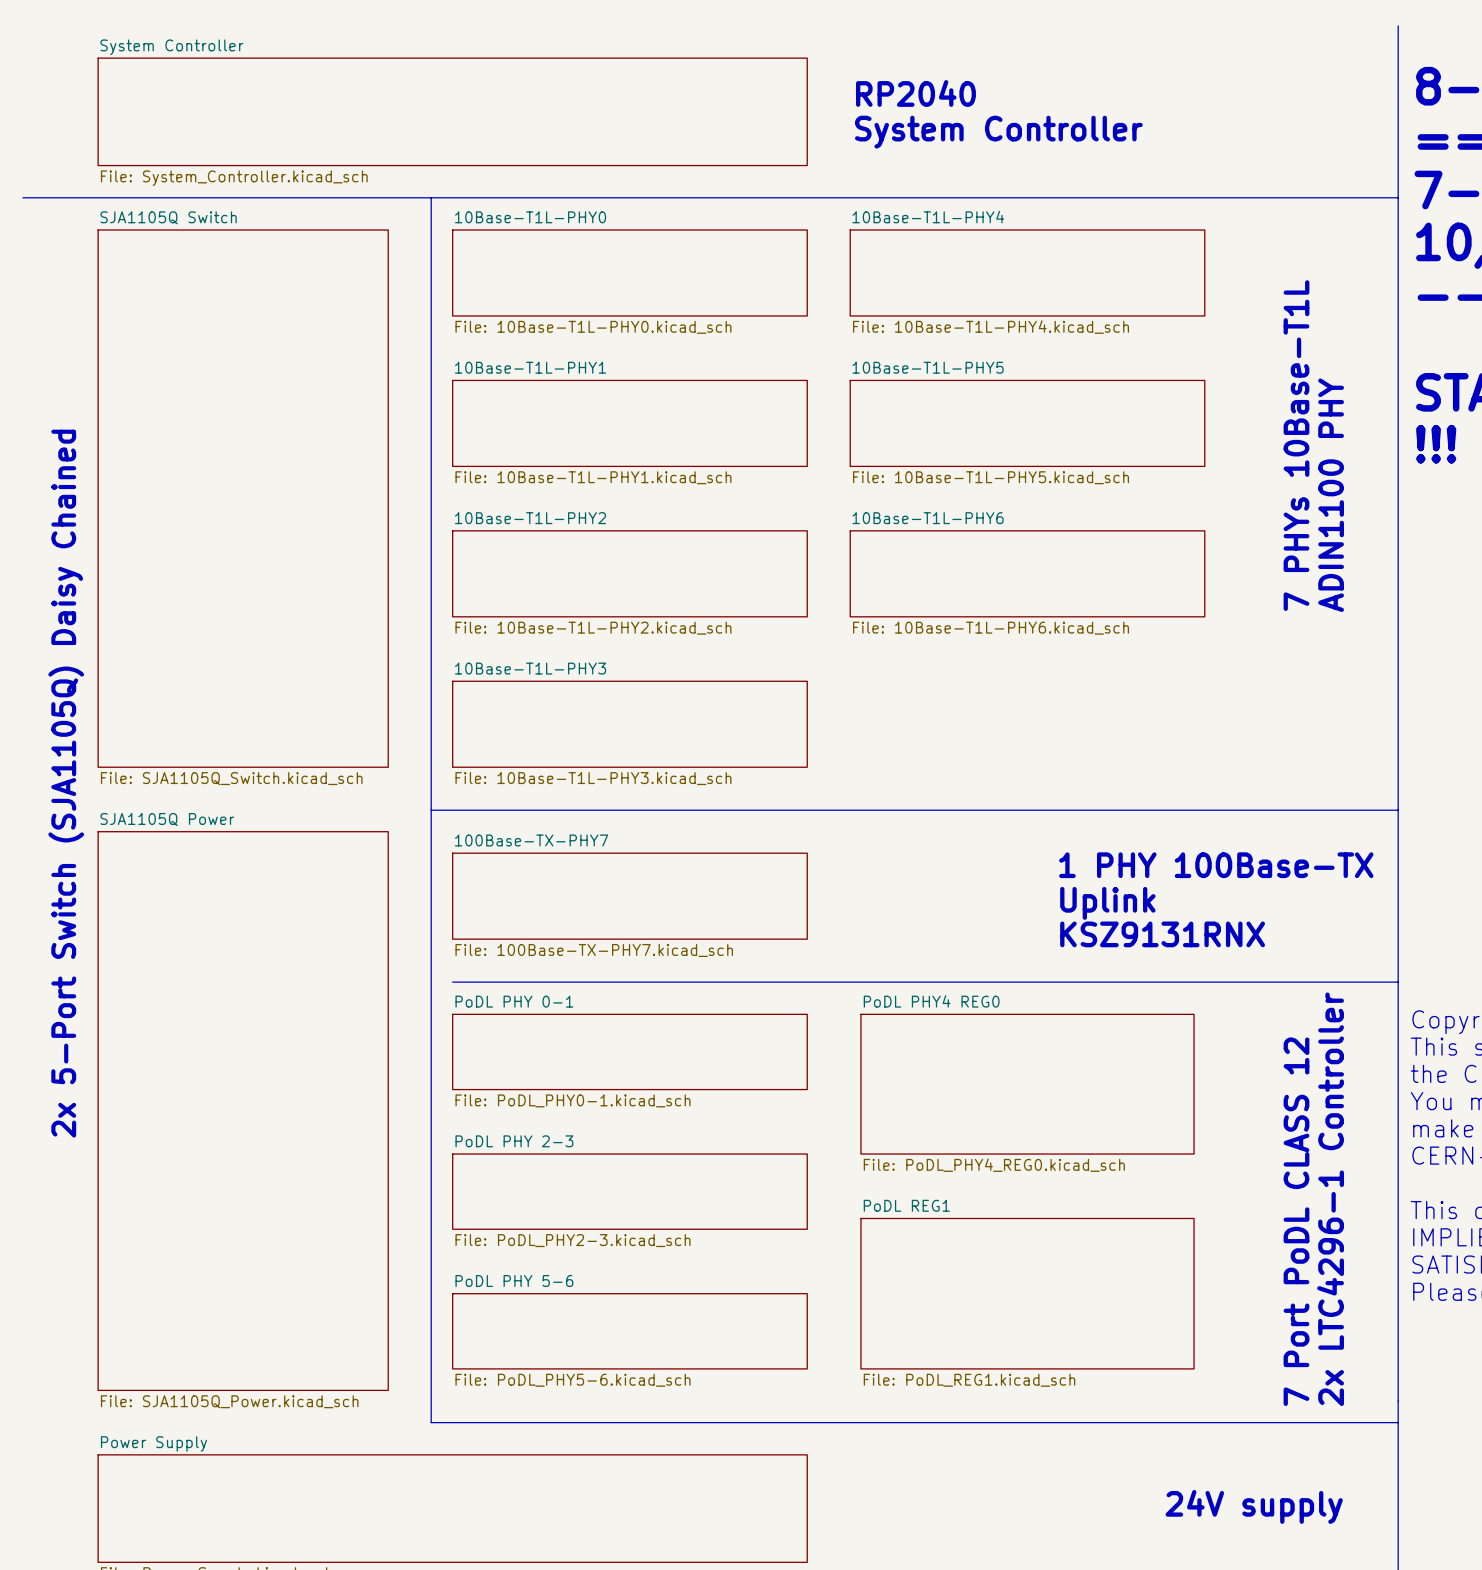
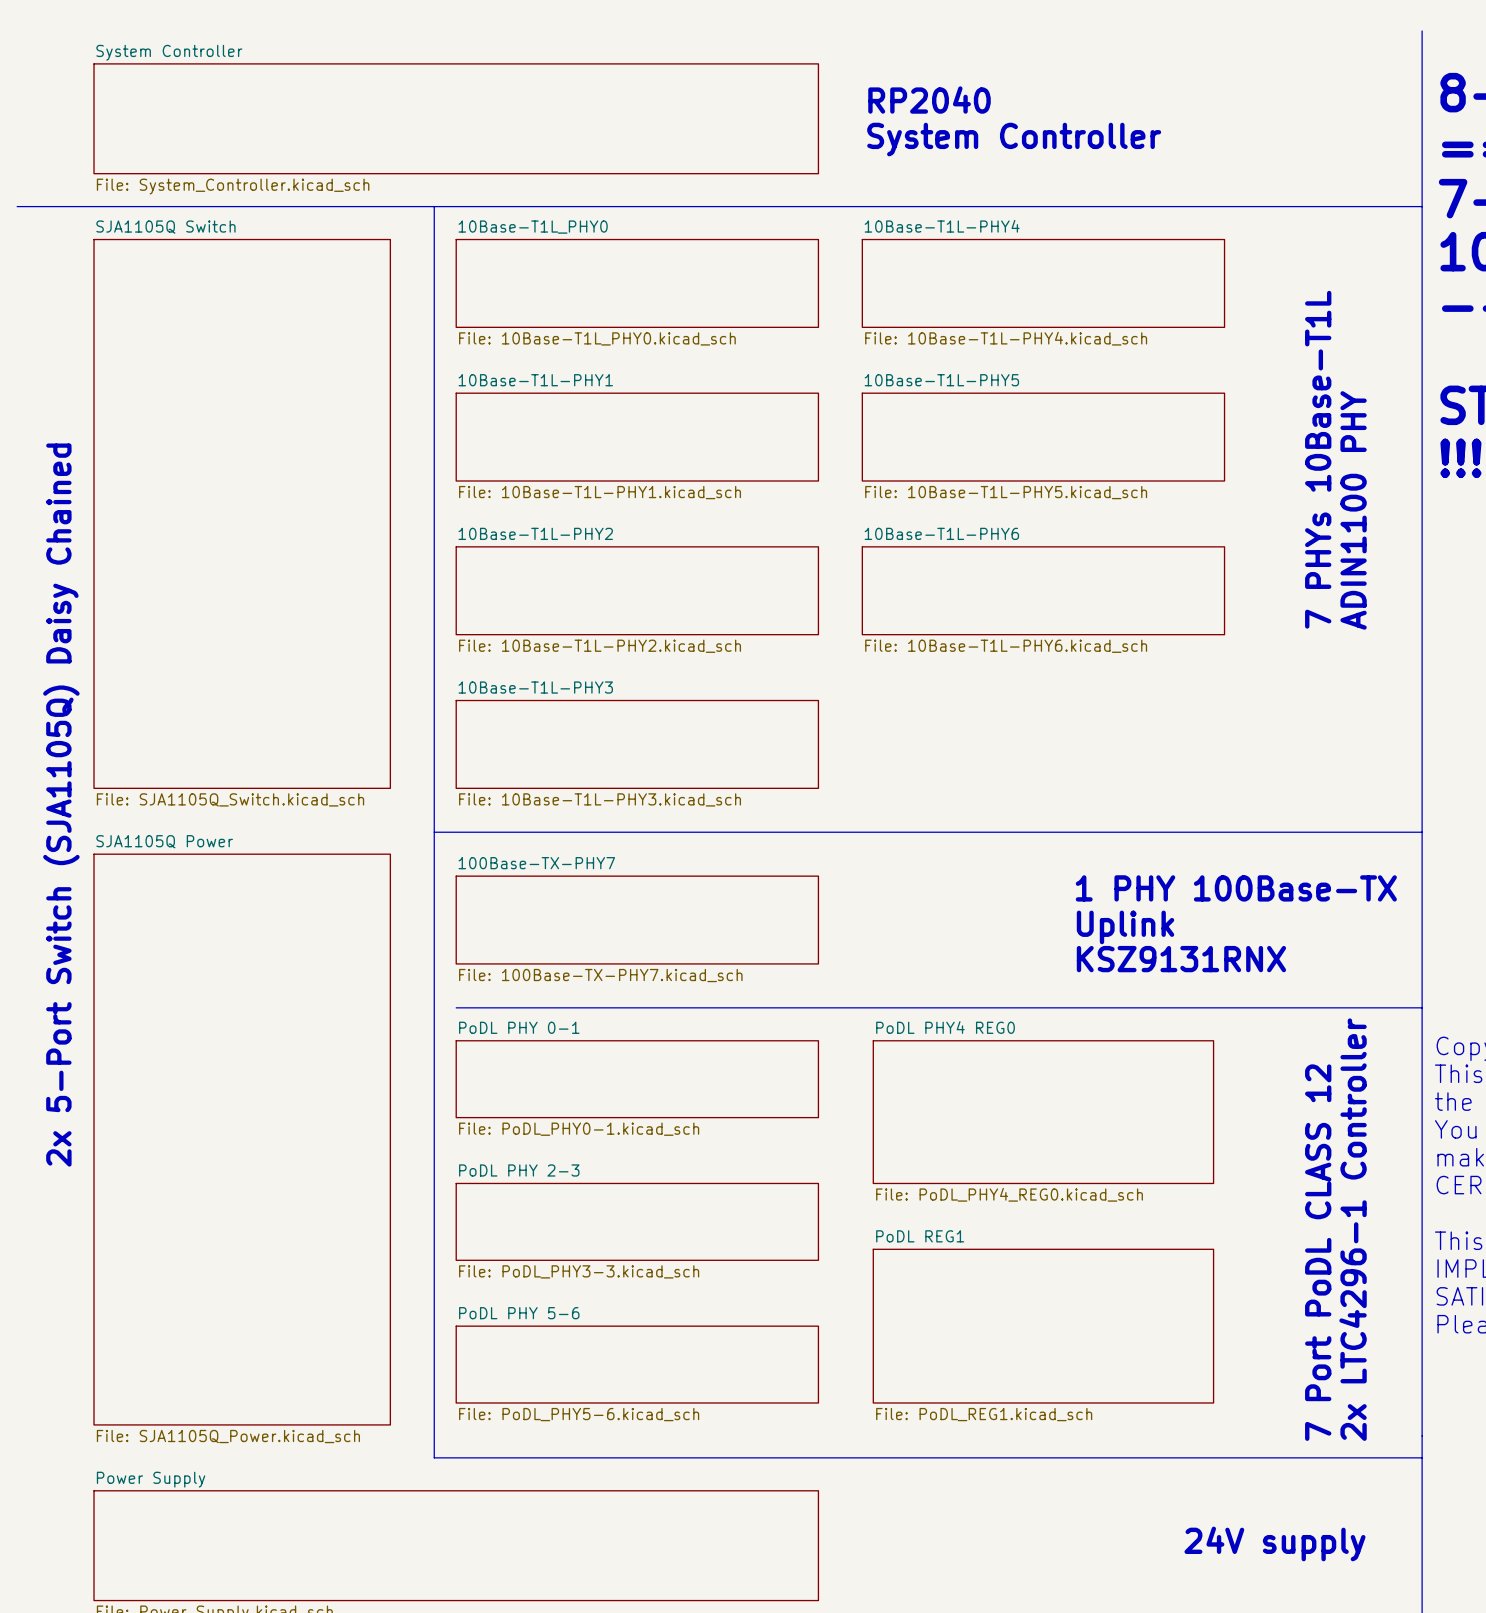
sheet 10Base-T1L-PHY0 name: 10Base-T1L-PHY0 (530, 217) -> 10Base-T1L_PHY0 (533, 227)
sheet 10Base-T1L-PHY0 value: File: 10Base-T1L-PHY0.kicad_sch (593, 327) -> File: 10Base-T1L_PHY0.kicad_sch (597, 338)
sheet PoDL PHY 2-3 value: File: PoDL_PHY2-3.kicad_sch (573, 1240) -> File: PoDL_PHY3-3.kicad_sch (579, 1271)

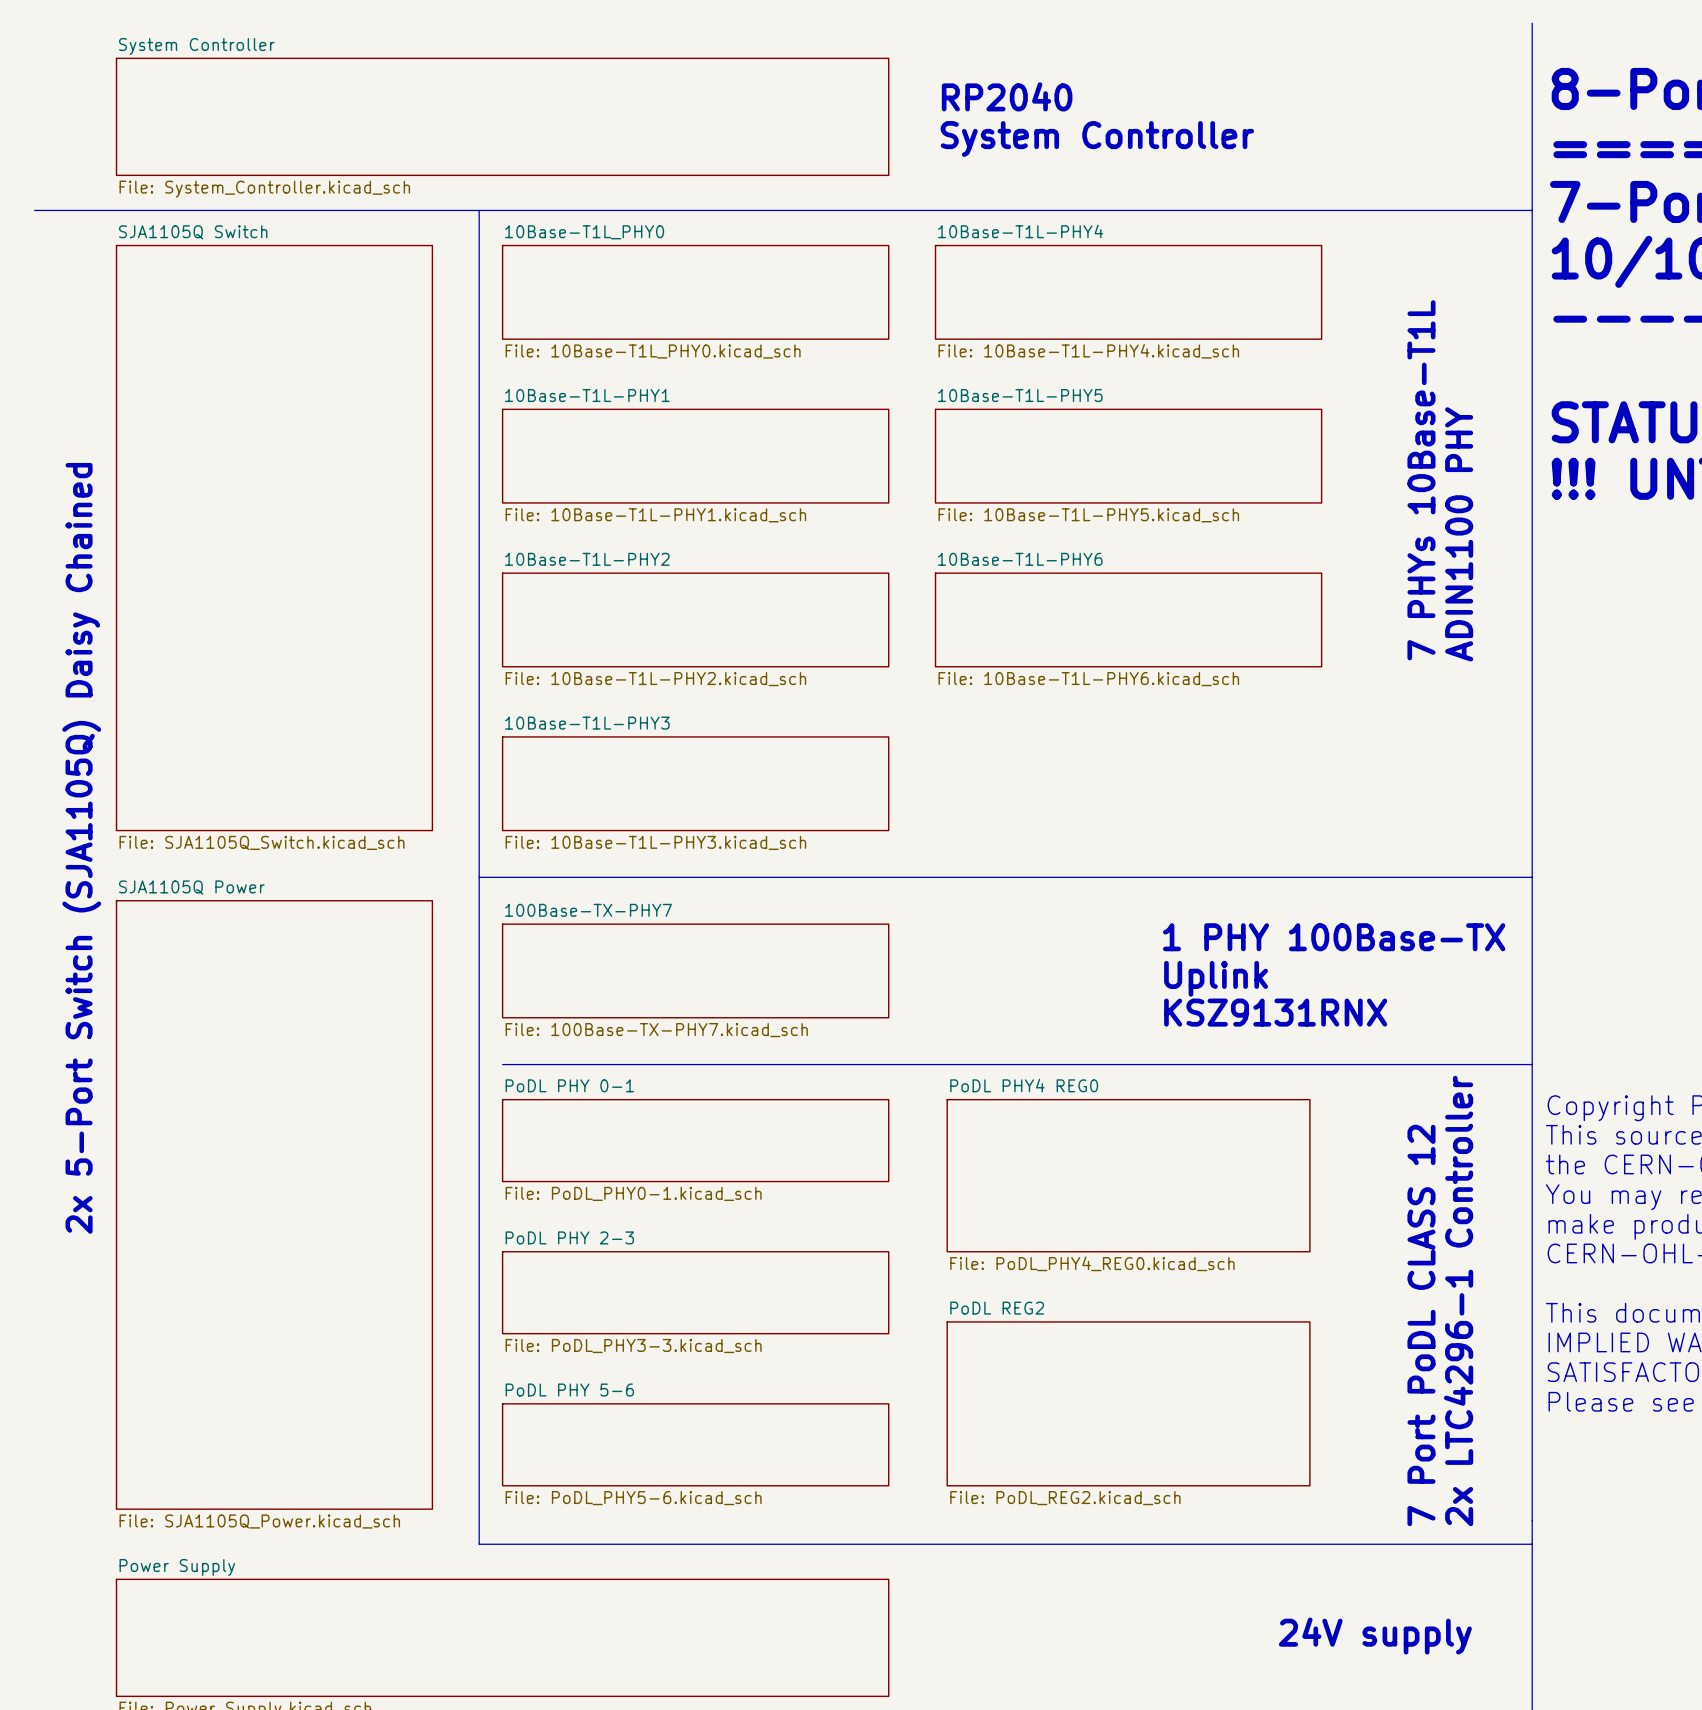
sheet PoDL REG1 name: PoDL REG1 (920, 1236) -> PoDL REG2 (997, 1308)
sheet PoDL REG1 value: File: PoDL_REG1.kicad_sch (984, 1414) -> File: PoDL_REG2.kicad_sch (1065, 1498)

